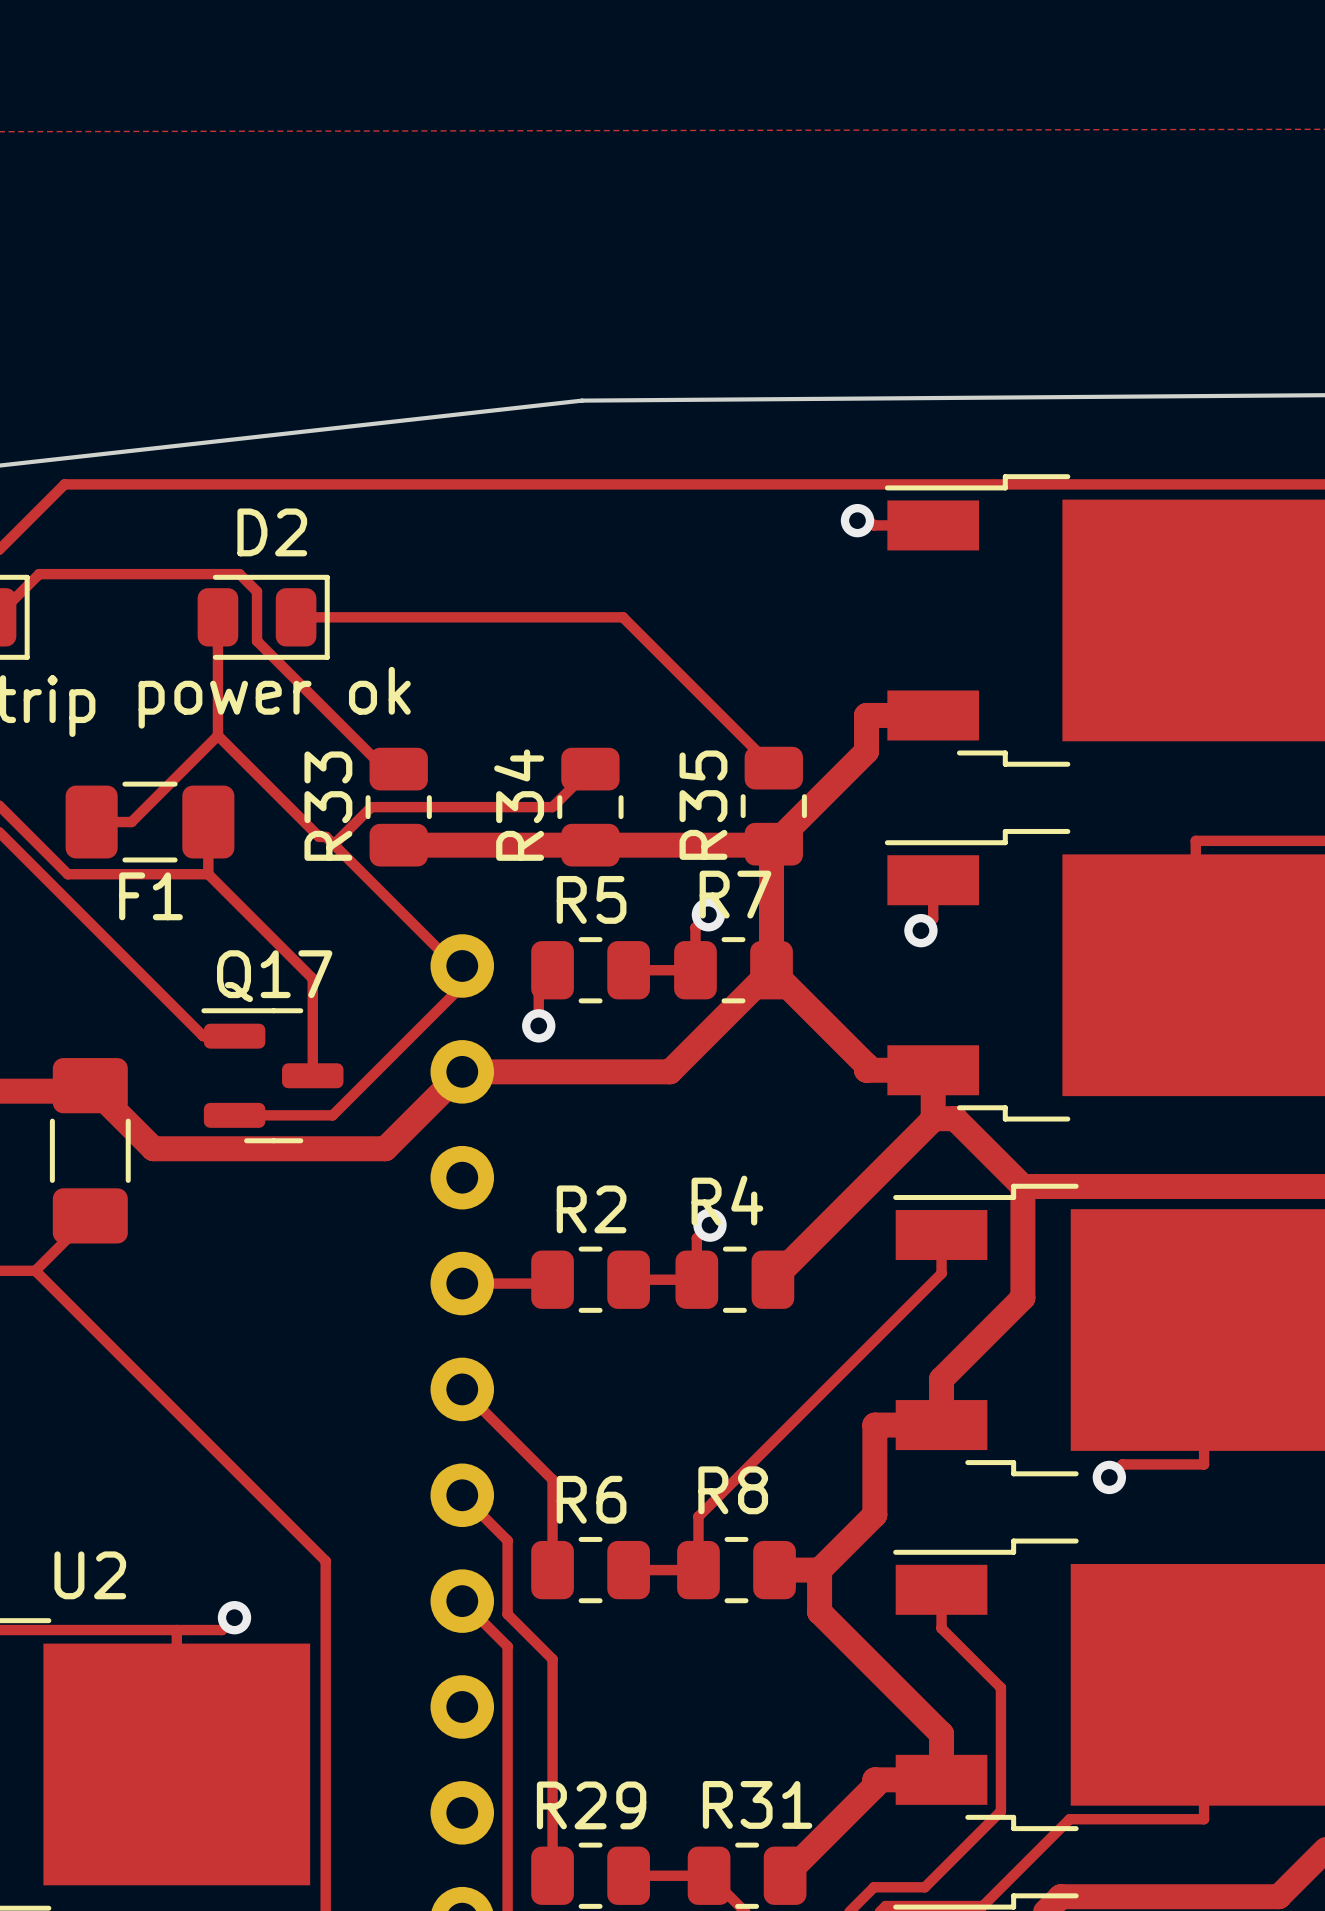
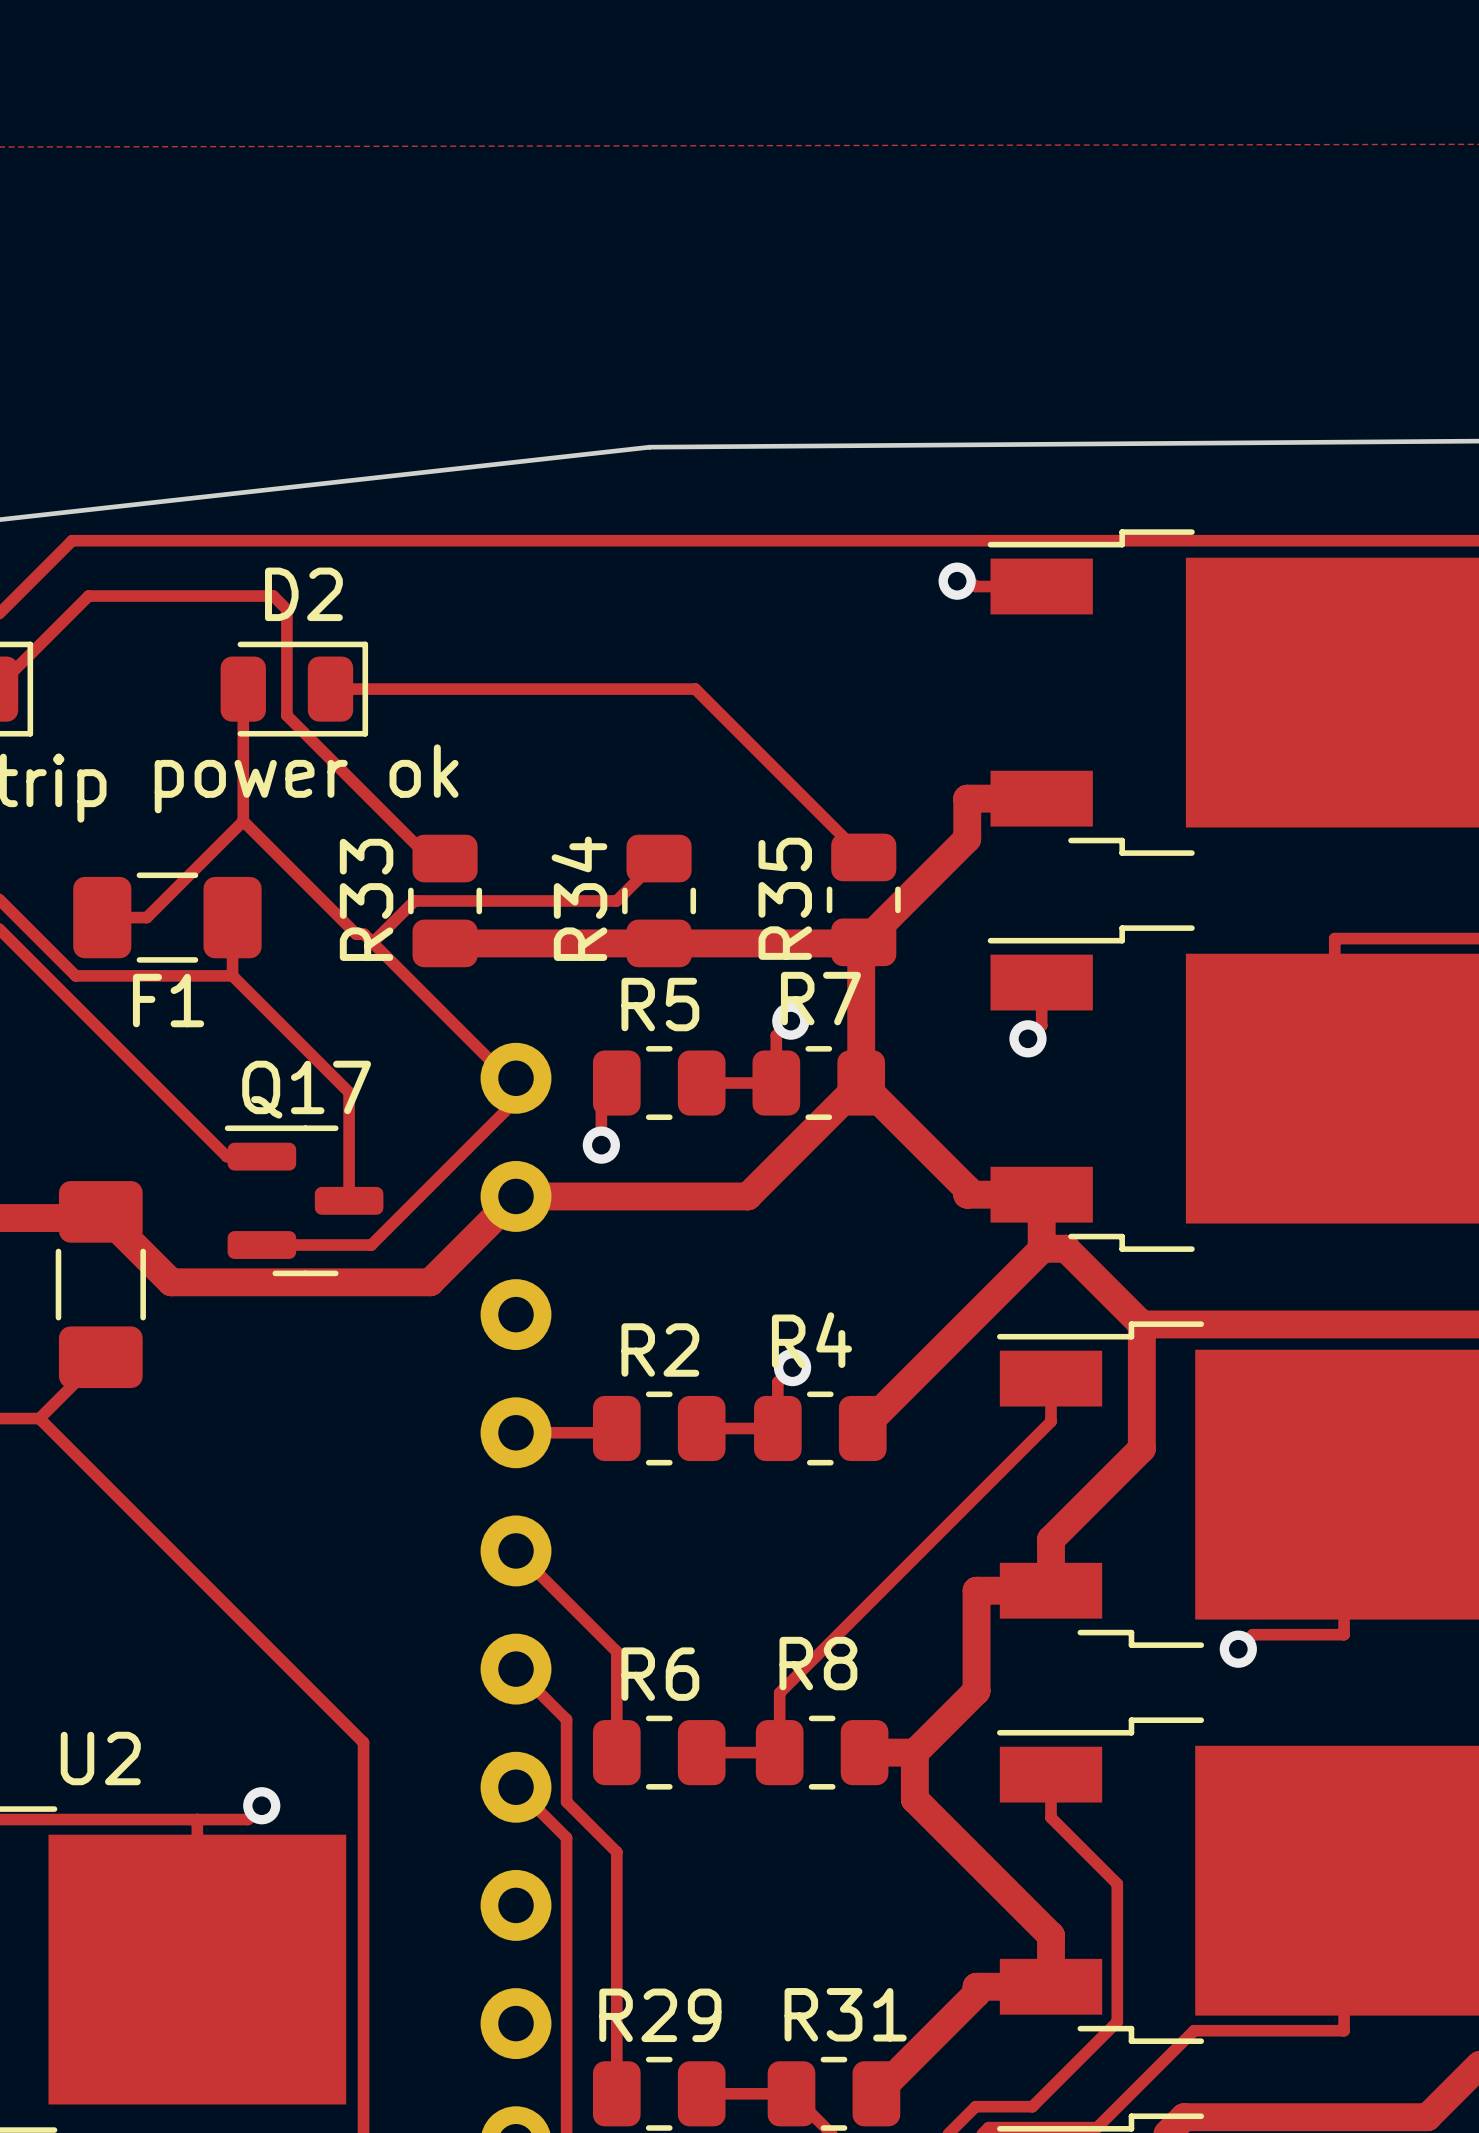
track: (39, 574) (239, 574) (257, 591) -> (43, 640) (88, 596) (273, 596) (286, 609) (286, 660)

